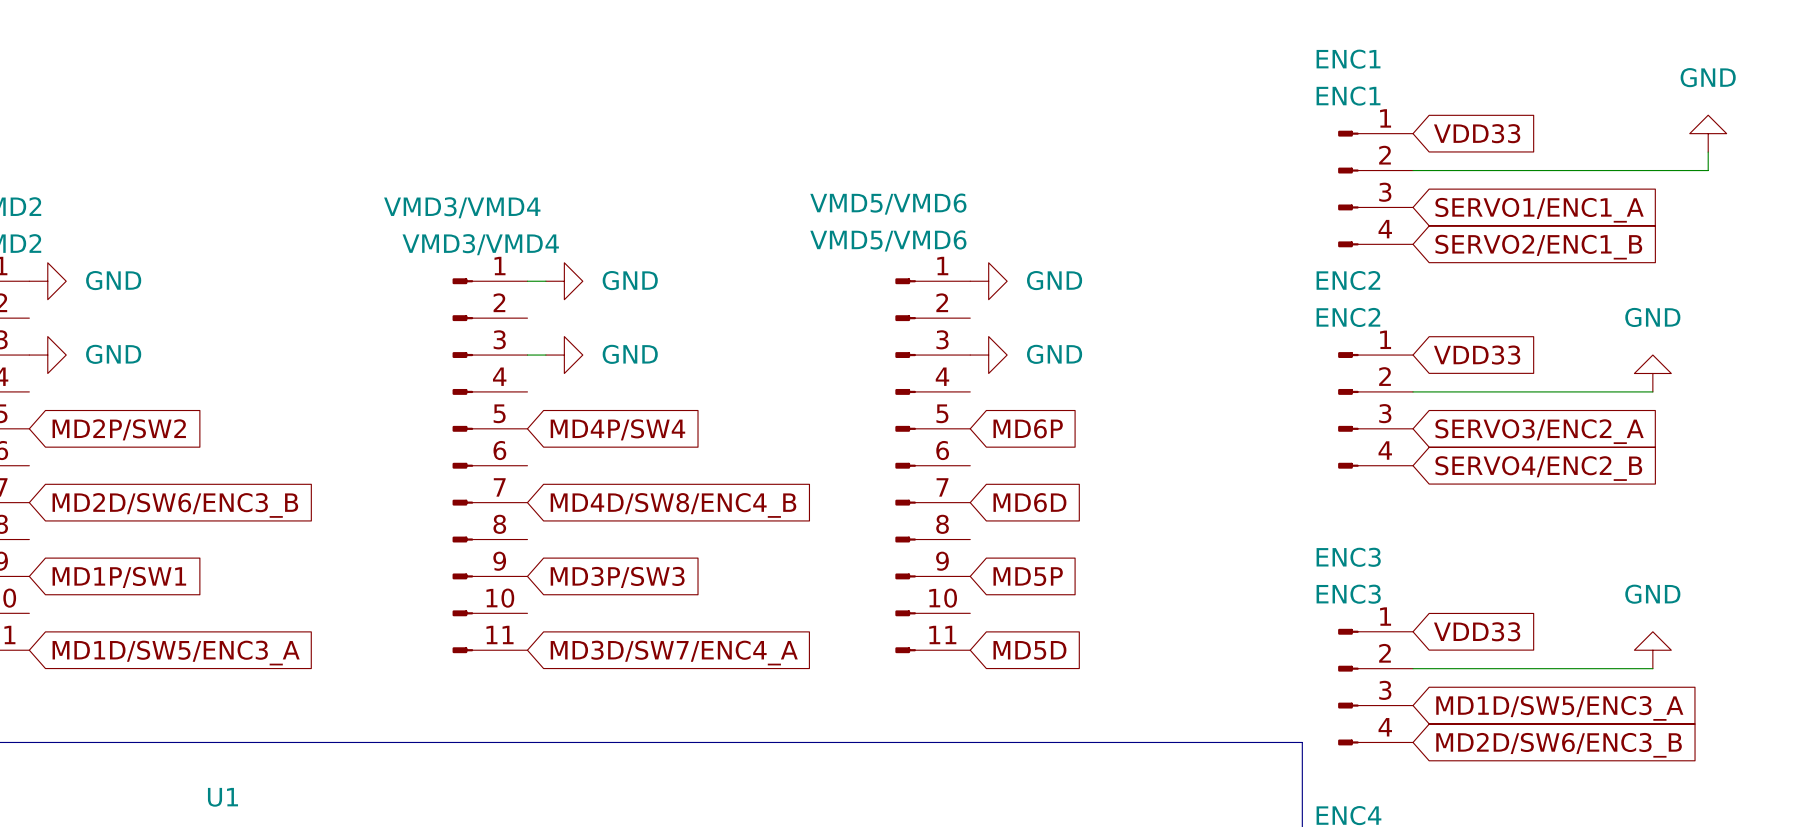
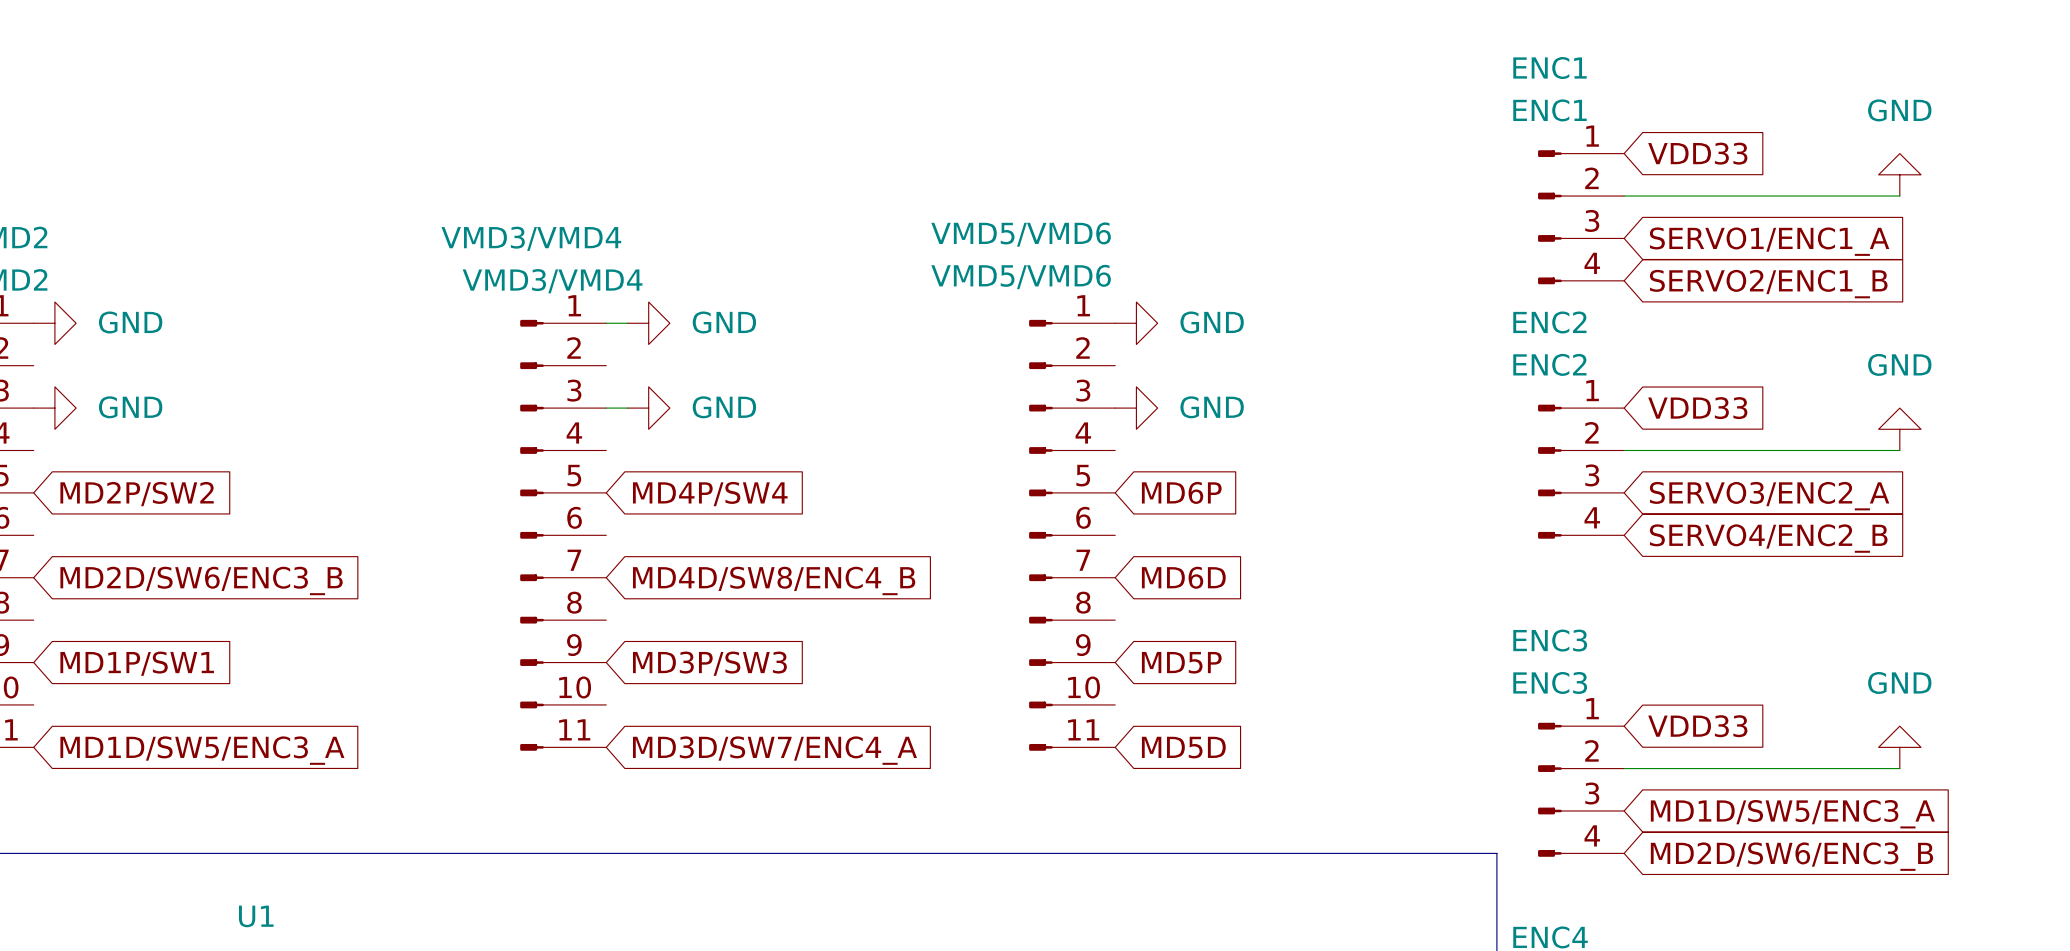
power symbol position: GND (1708, 133) -> GND (1899, 174)
wire: (1708, 152) (1708, 170) (1652, 170) -> none

